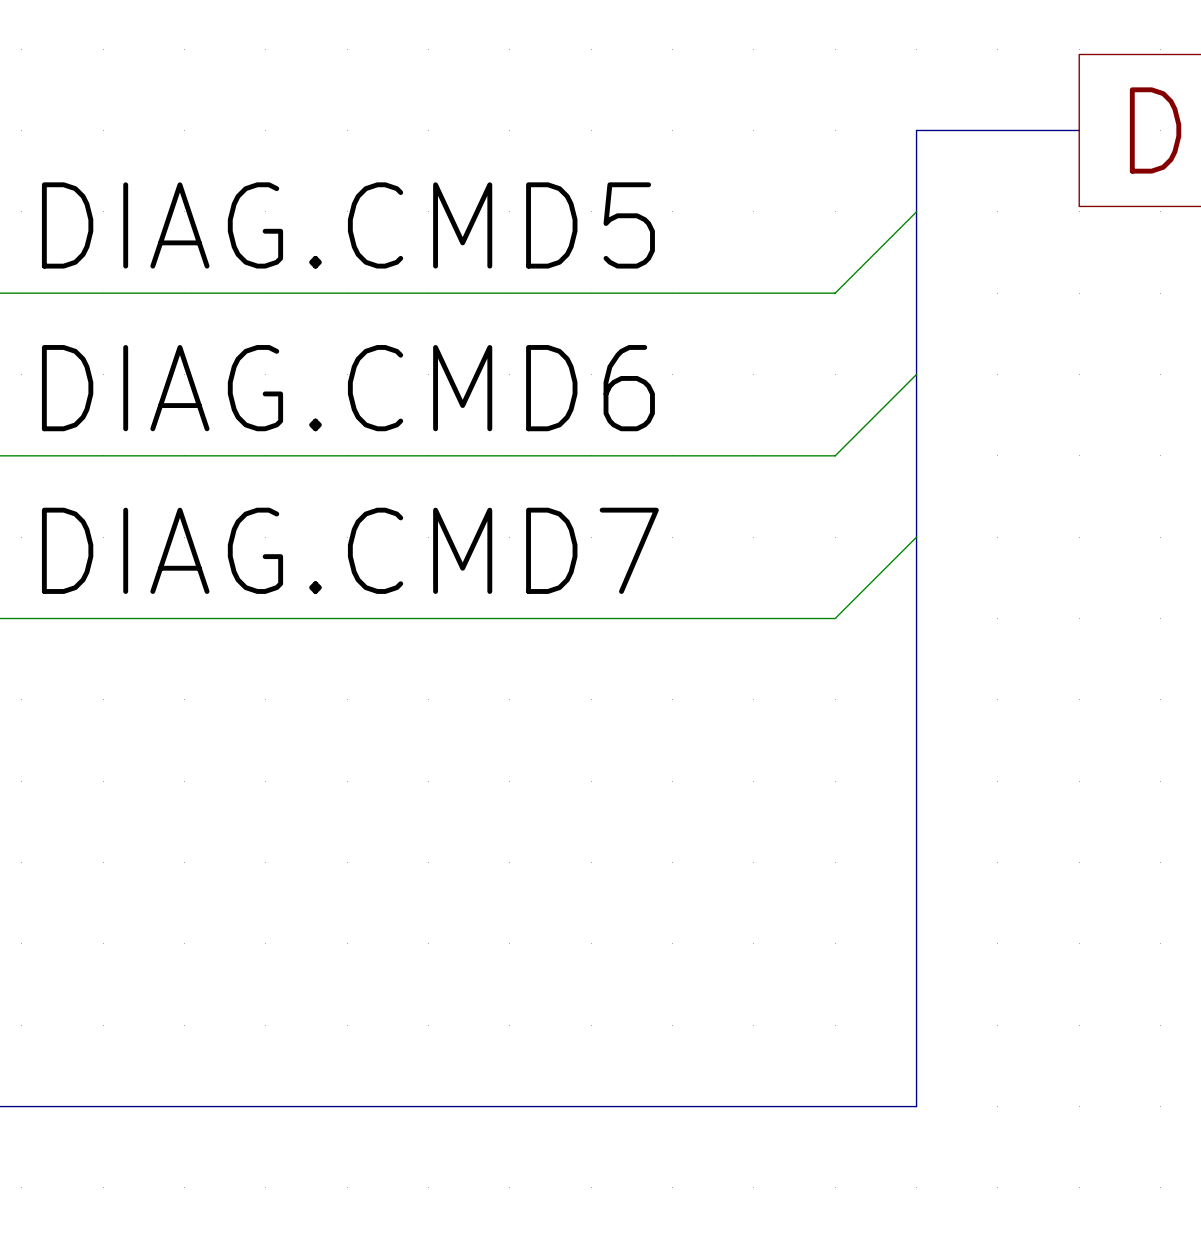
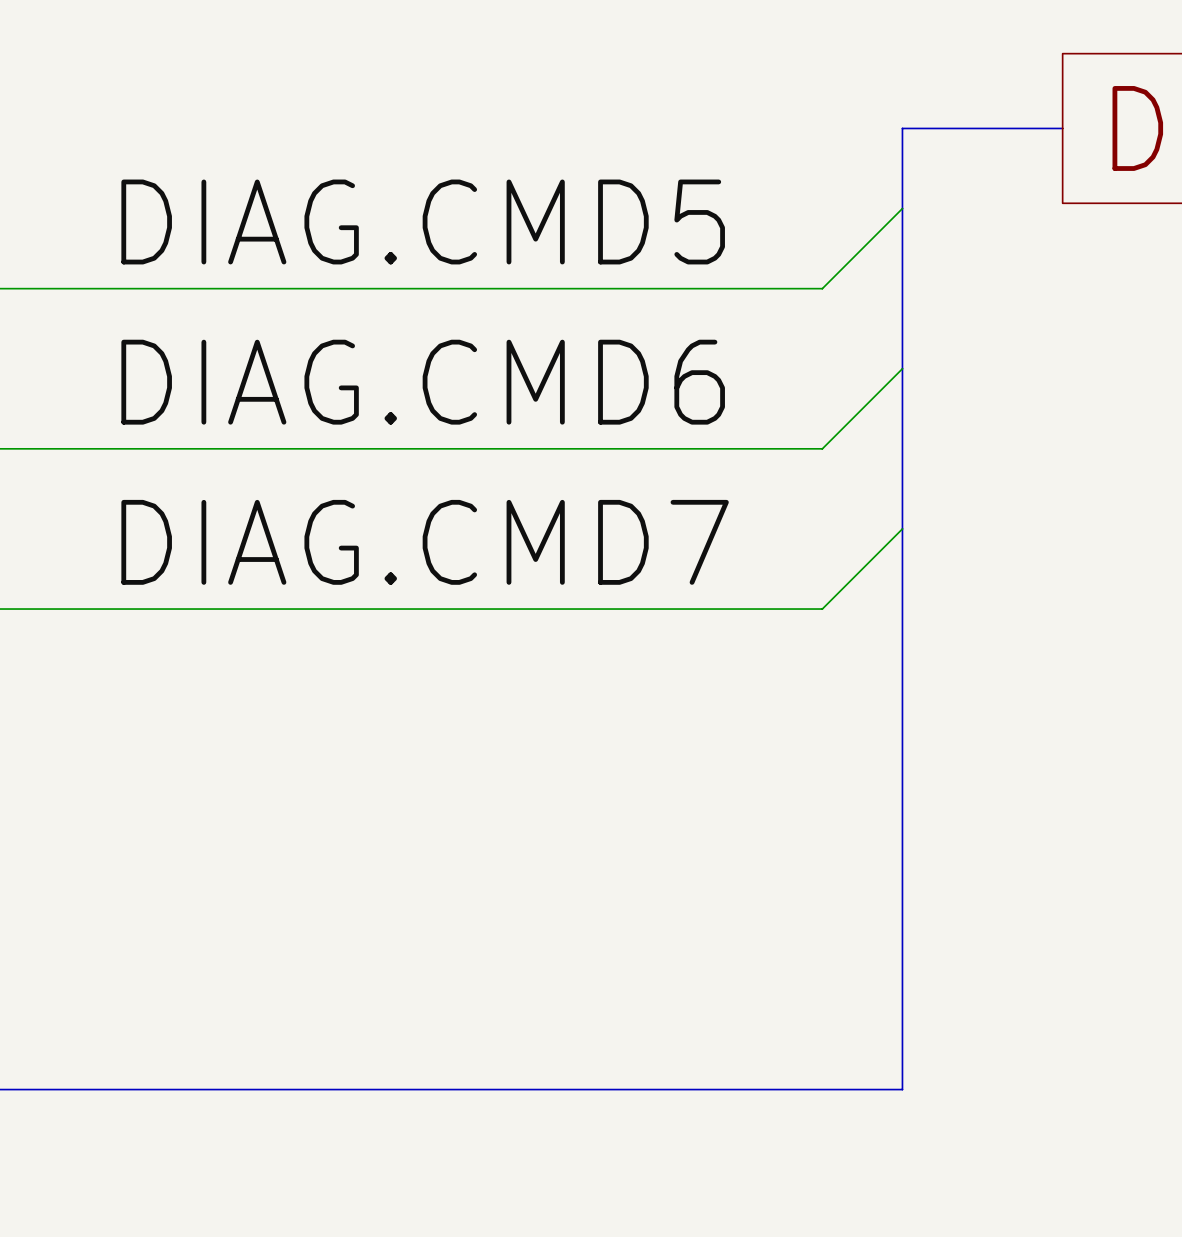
label position: DIAG.CMD5 (348, 225) -> DIAG.CMD5 (423, 221)
label position: DIAG.CMD6 (348, 388) -> DIAG.CMD6 (423, 382)
label position: DIAG.CMD7 (350, 550) -> DIAG.CMD7 (425, 542)

